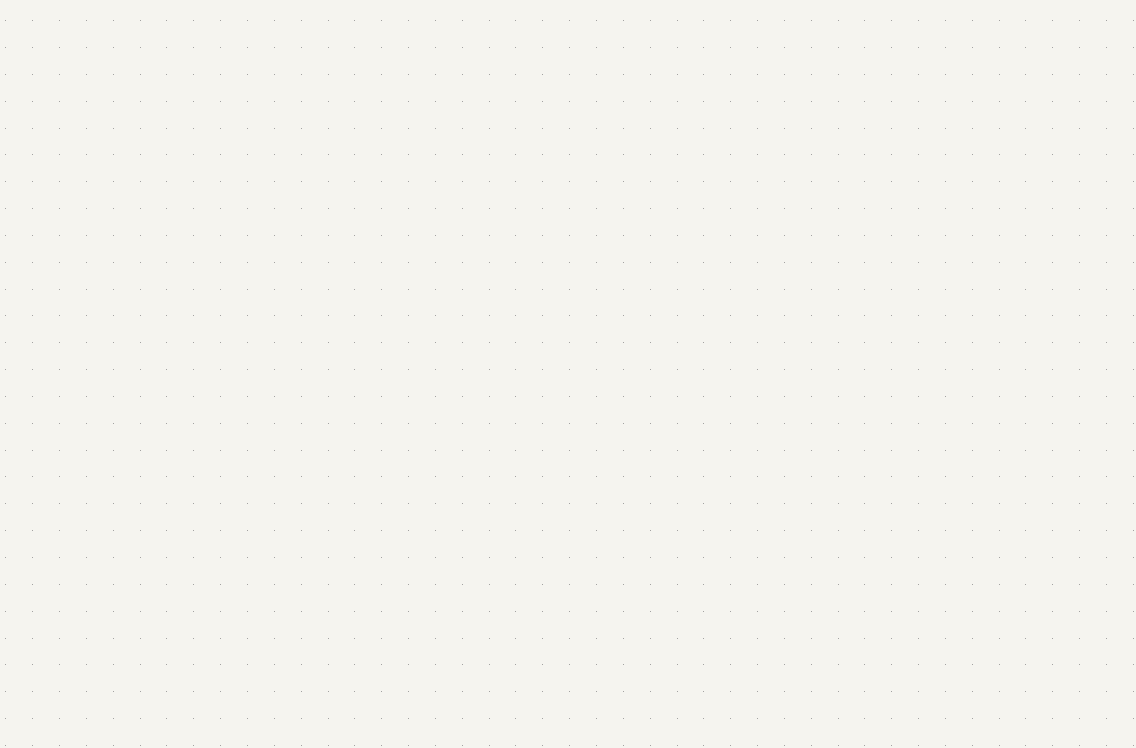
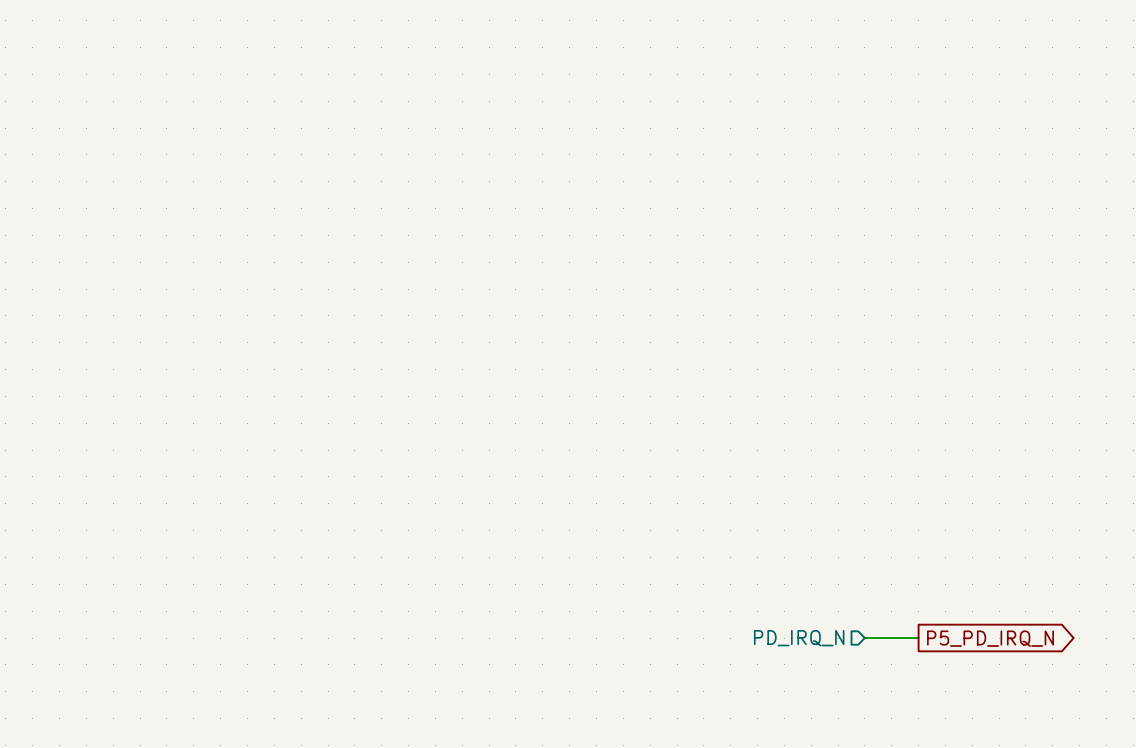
sheet pin: none -> PD_IRQ_N (799, 638)
wire: none -> (864, 638) (918, 638)
global label: none -> P5_PD_IRQ_N (990, 638)

